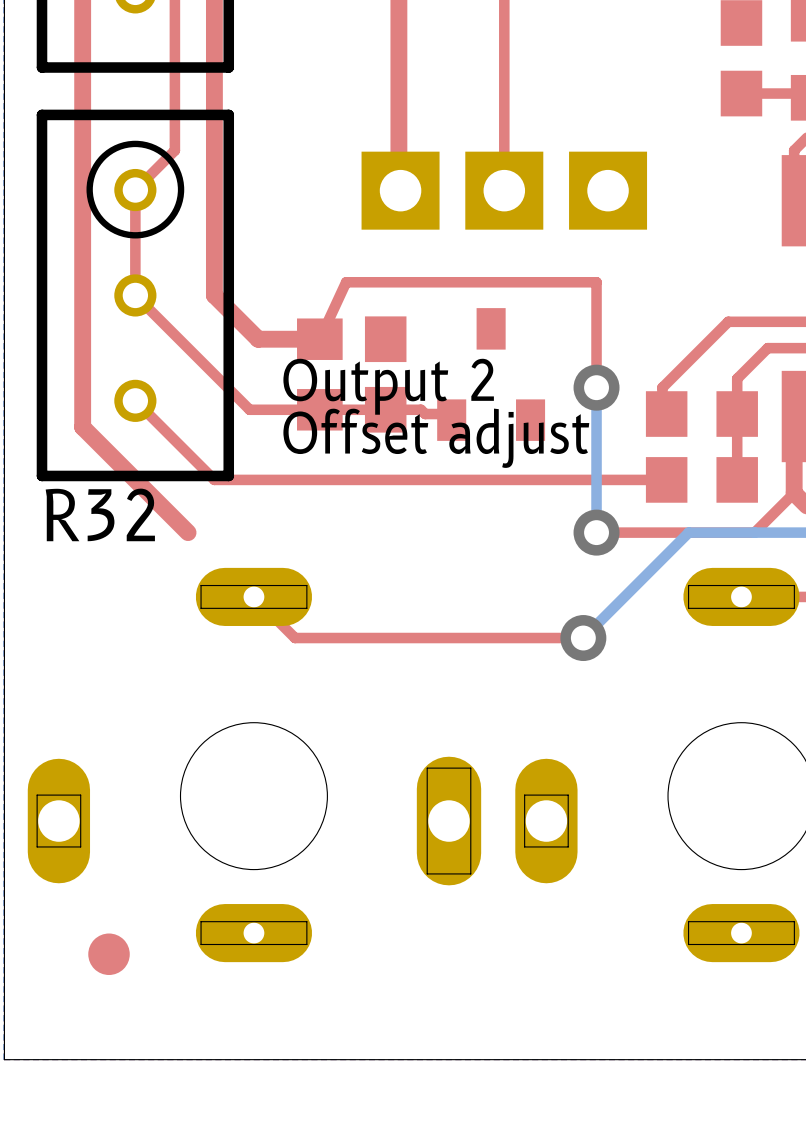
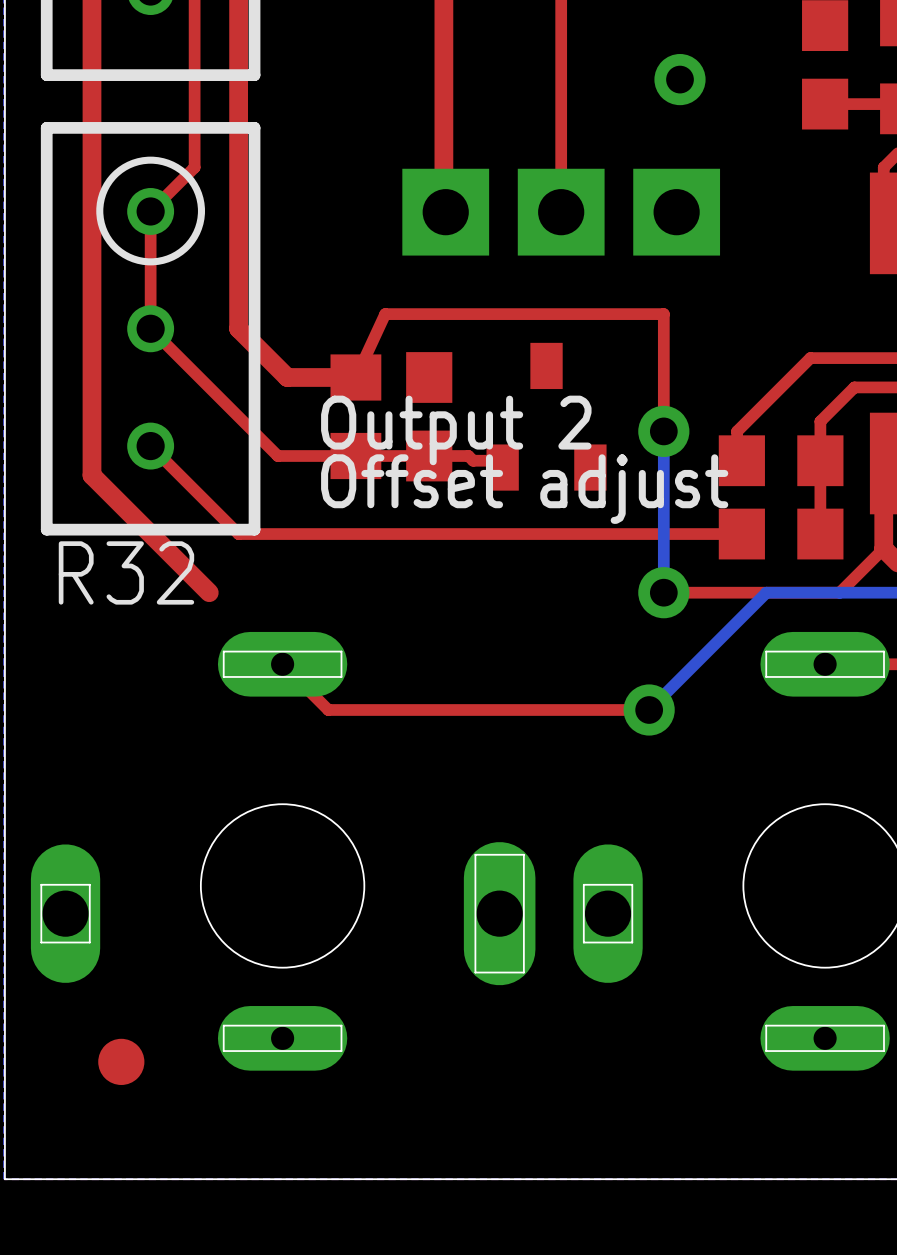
via: none -> (680, 79)

